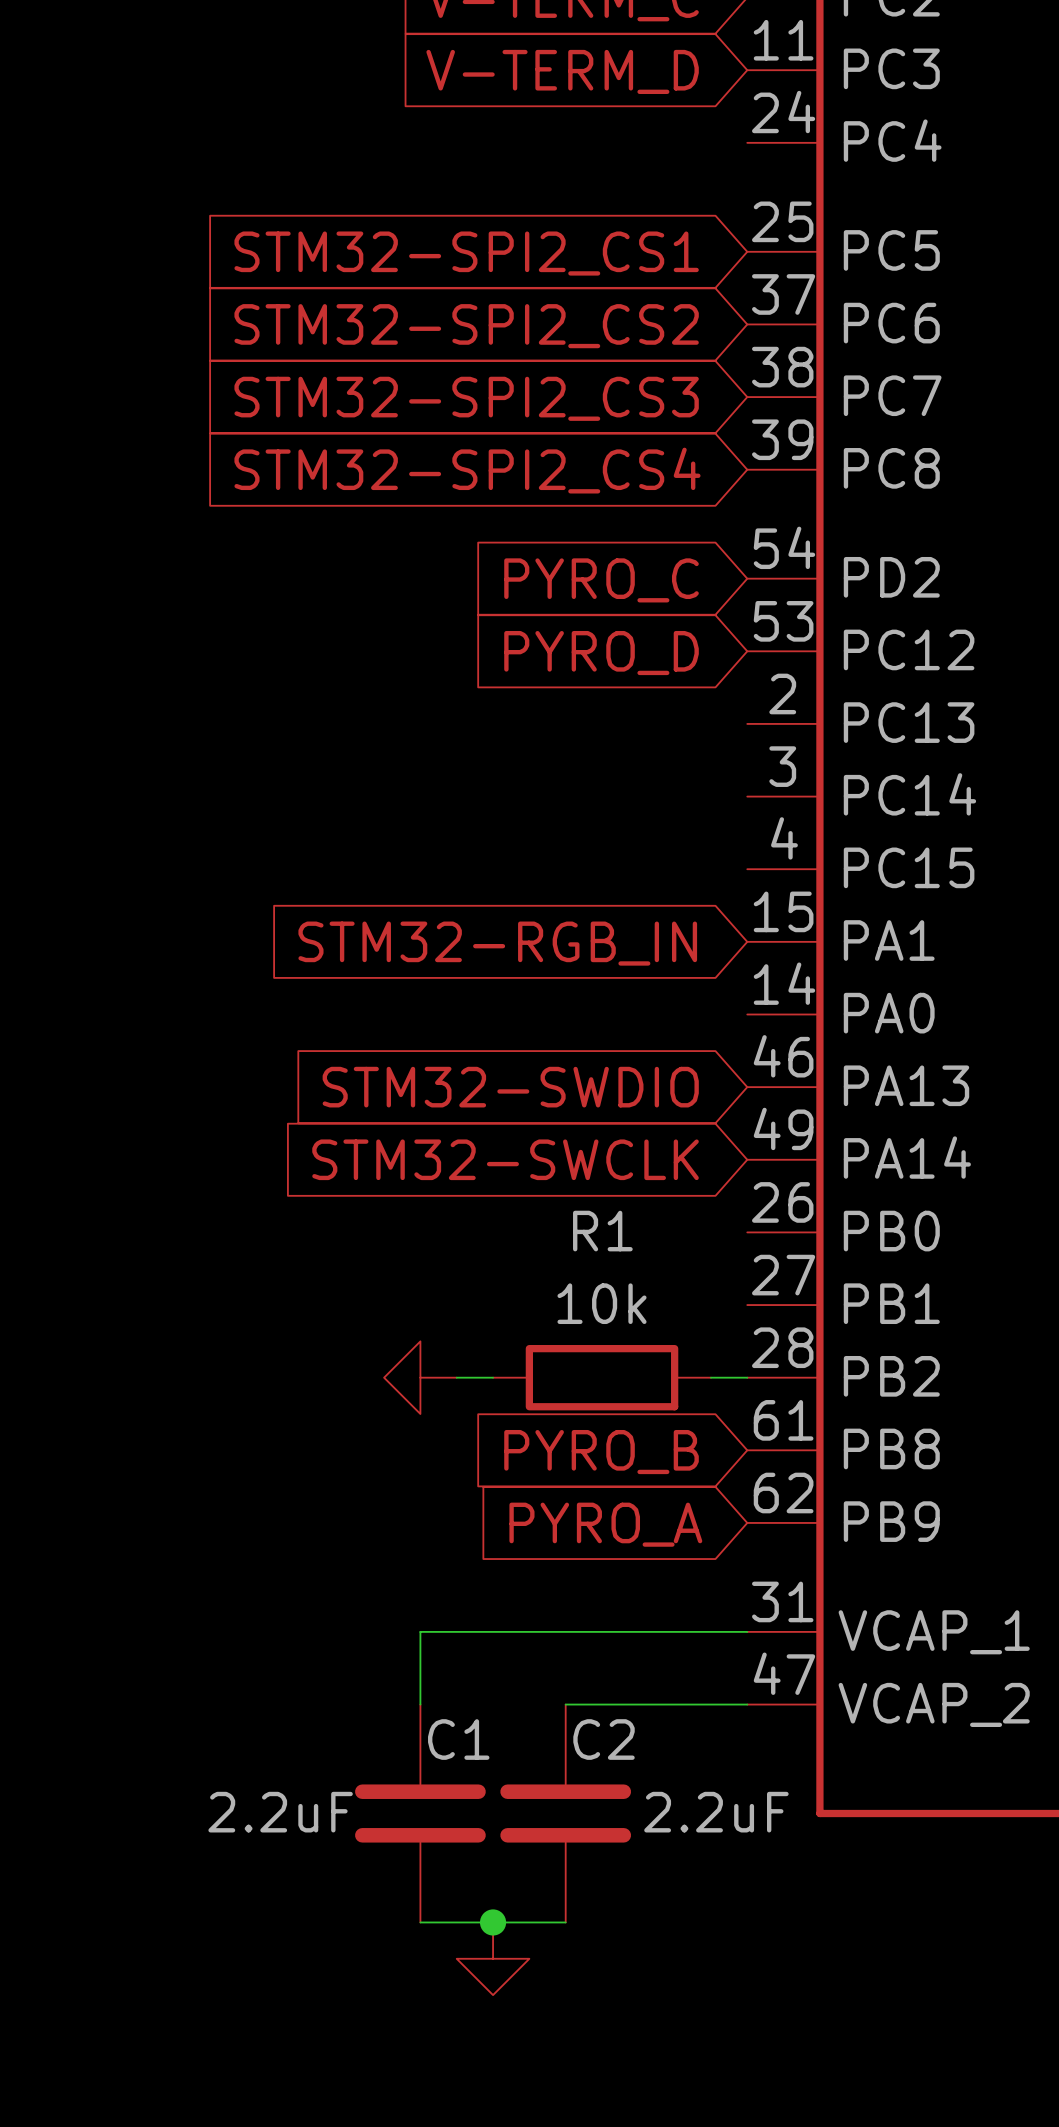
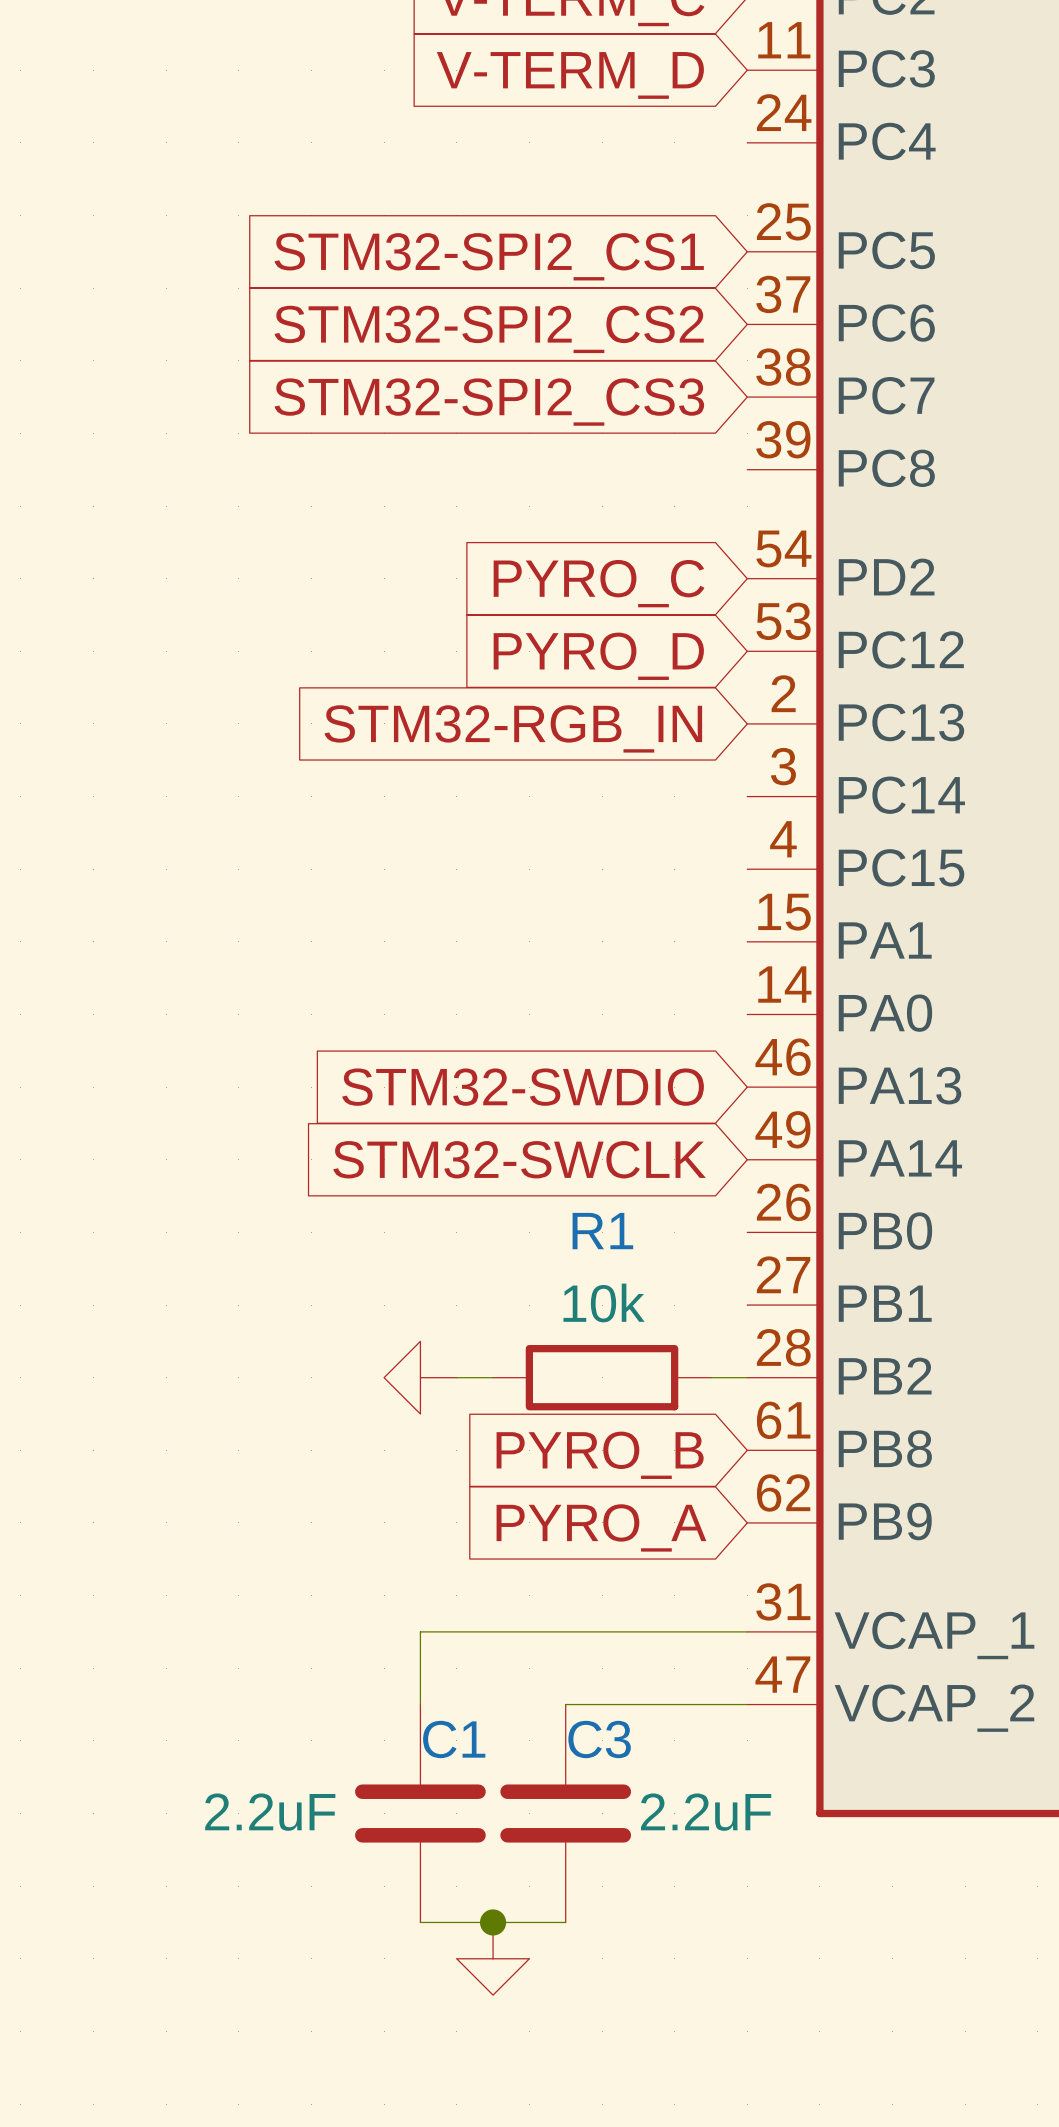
global label: STM32-SPI2_CS4 (467, 470) -> none
global label position: STM32-RGB_IN (497, 943) -> STM32-RGB_IN (513, 728)
C2 name: C2 (604, 1739) -> C3 (599, 1739)

